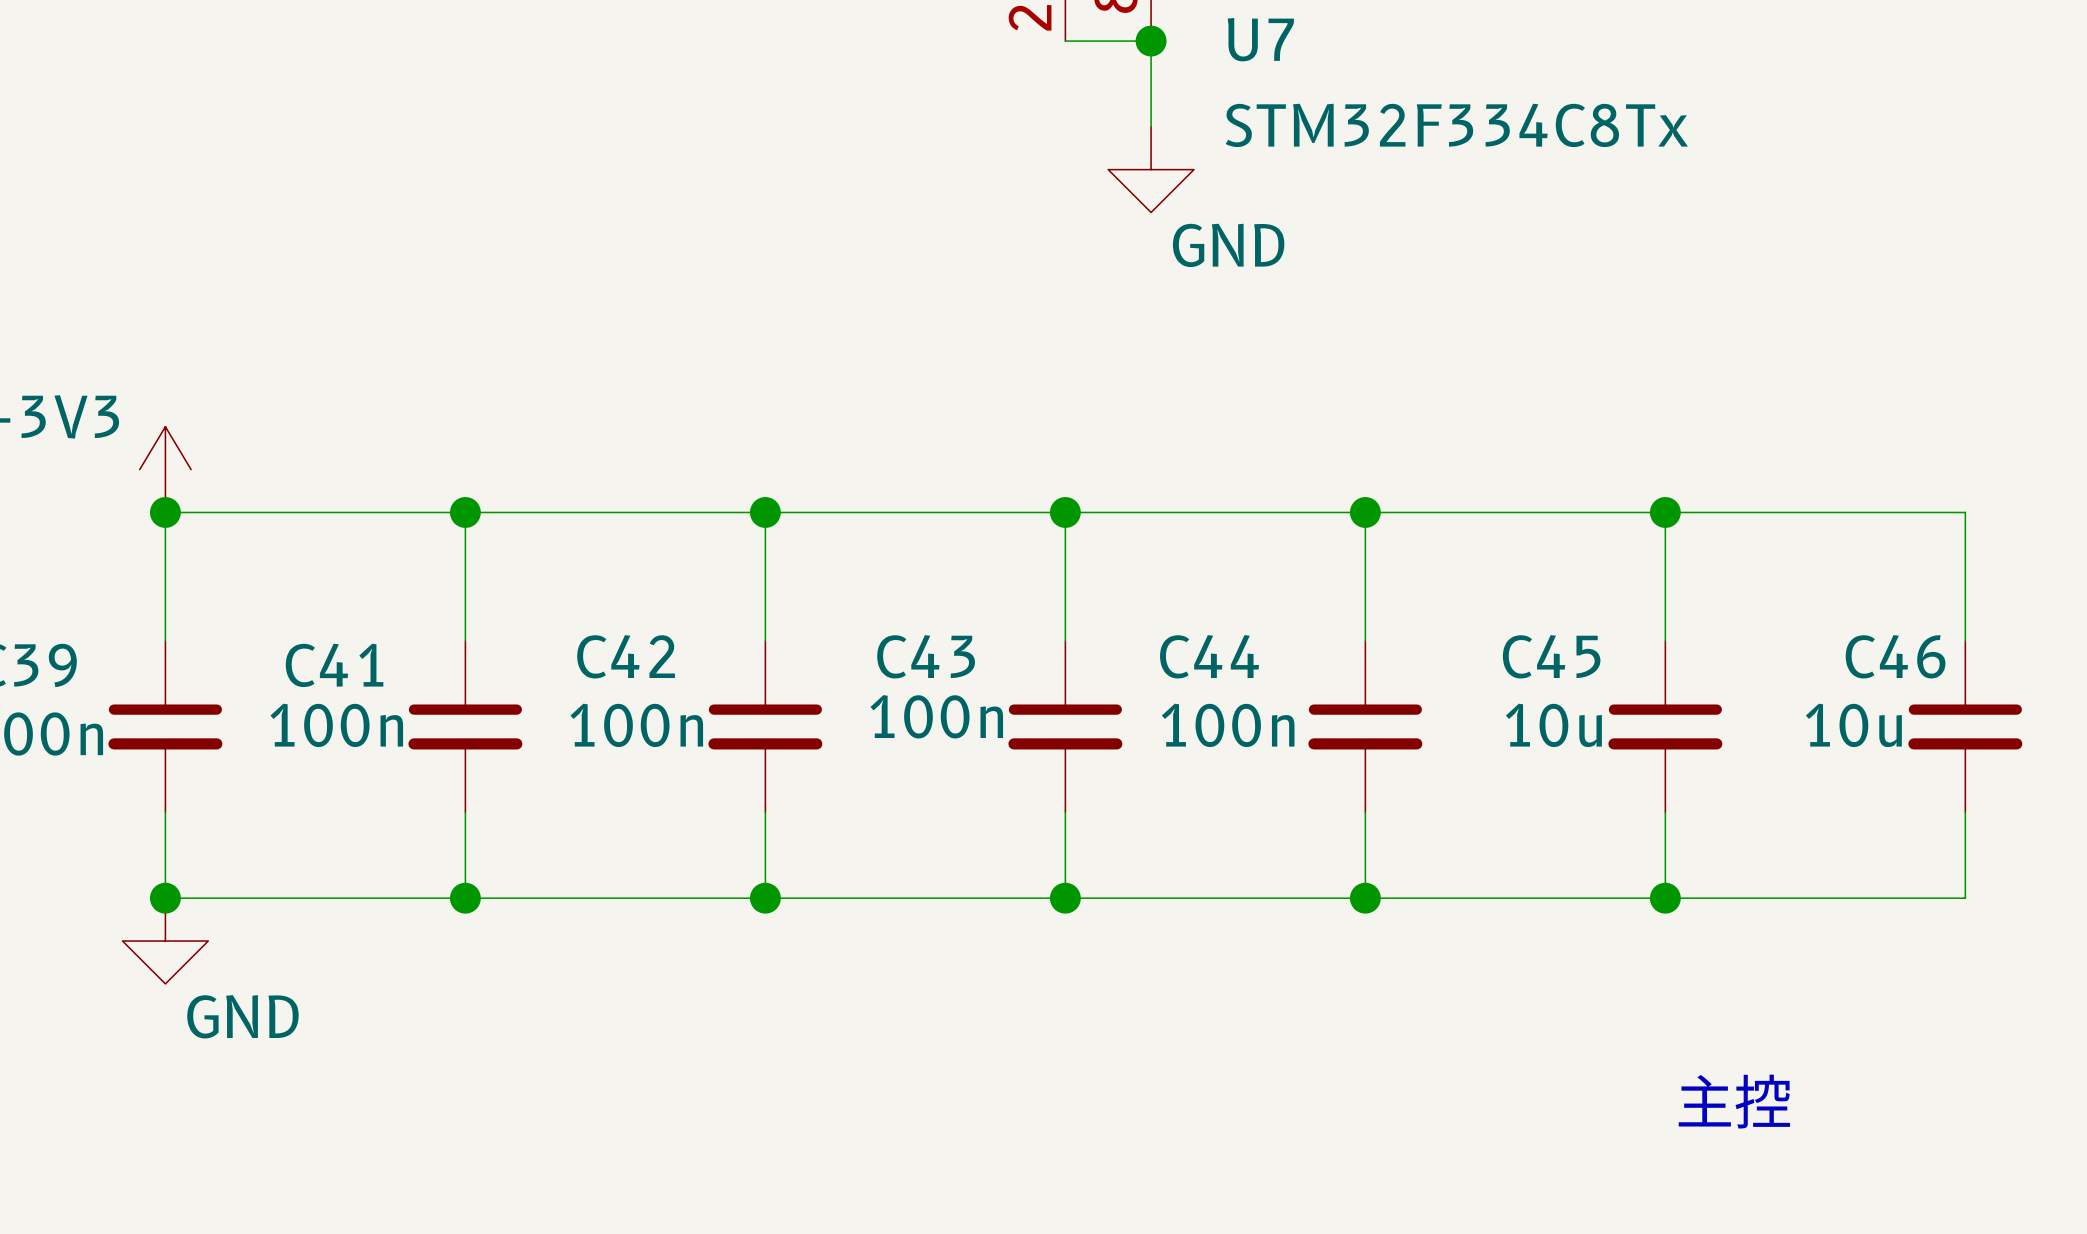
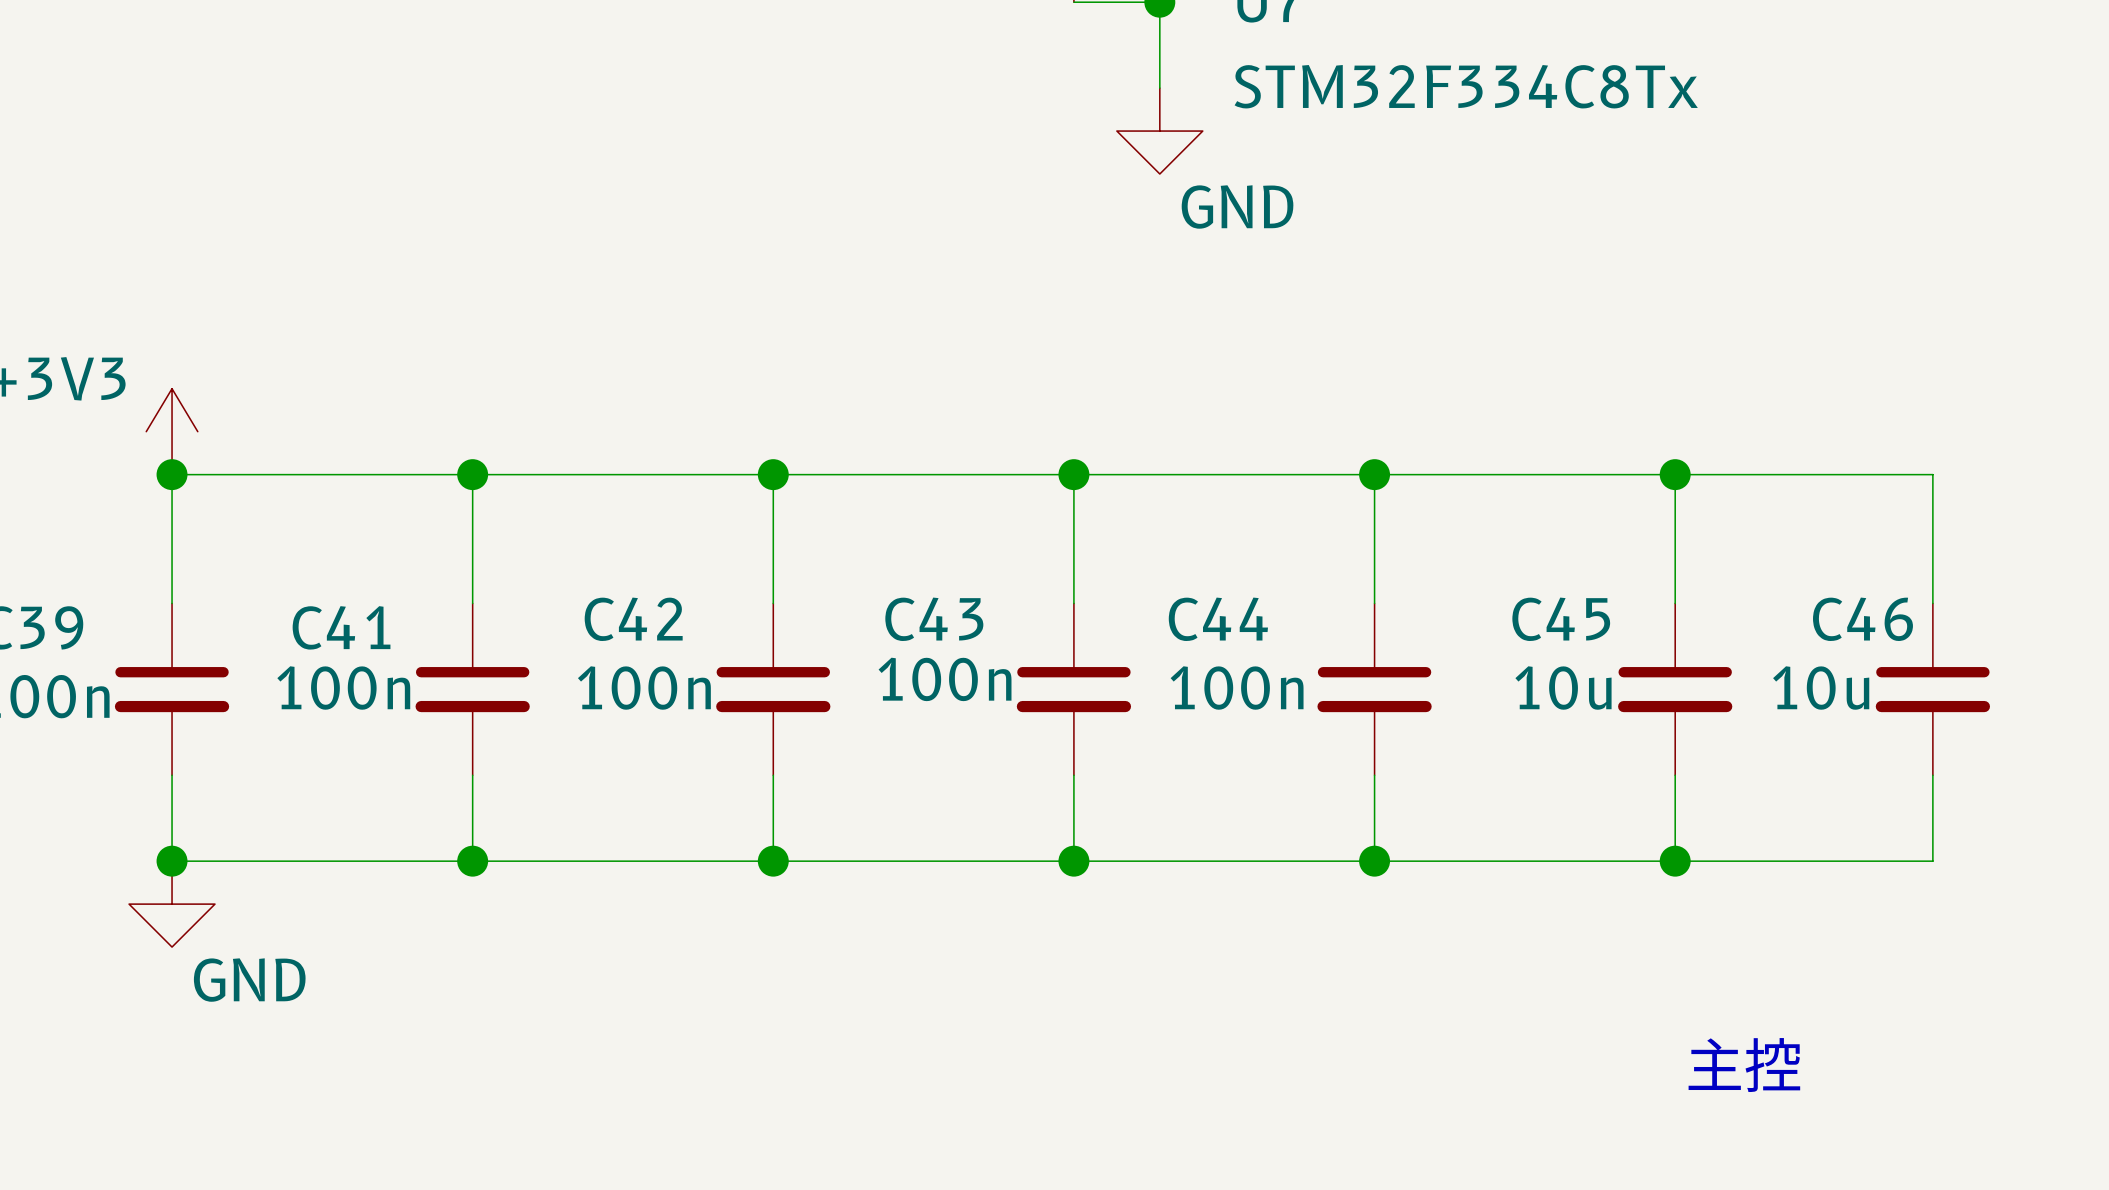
wire: (1922, 512) (1965, 512) (1965, 641) -> (1932, 474) (1932, 603)
C46 position: (1965, 726) -> (1932, 689)
wire: (1965, 812) (1965, 898) (1922, 898) -> (1932, 775) (1932, 861)

